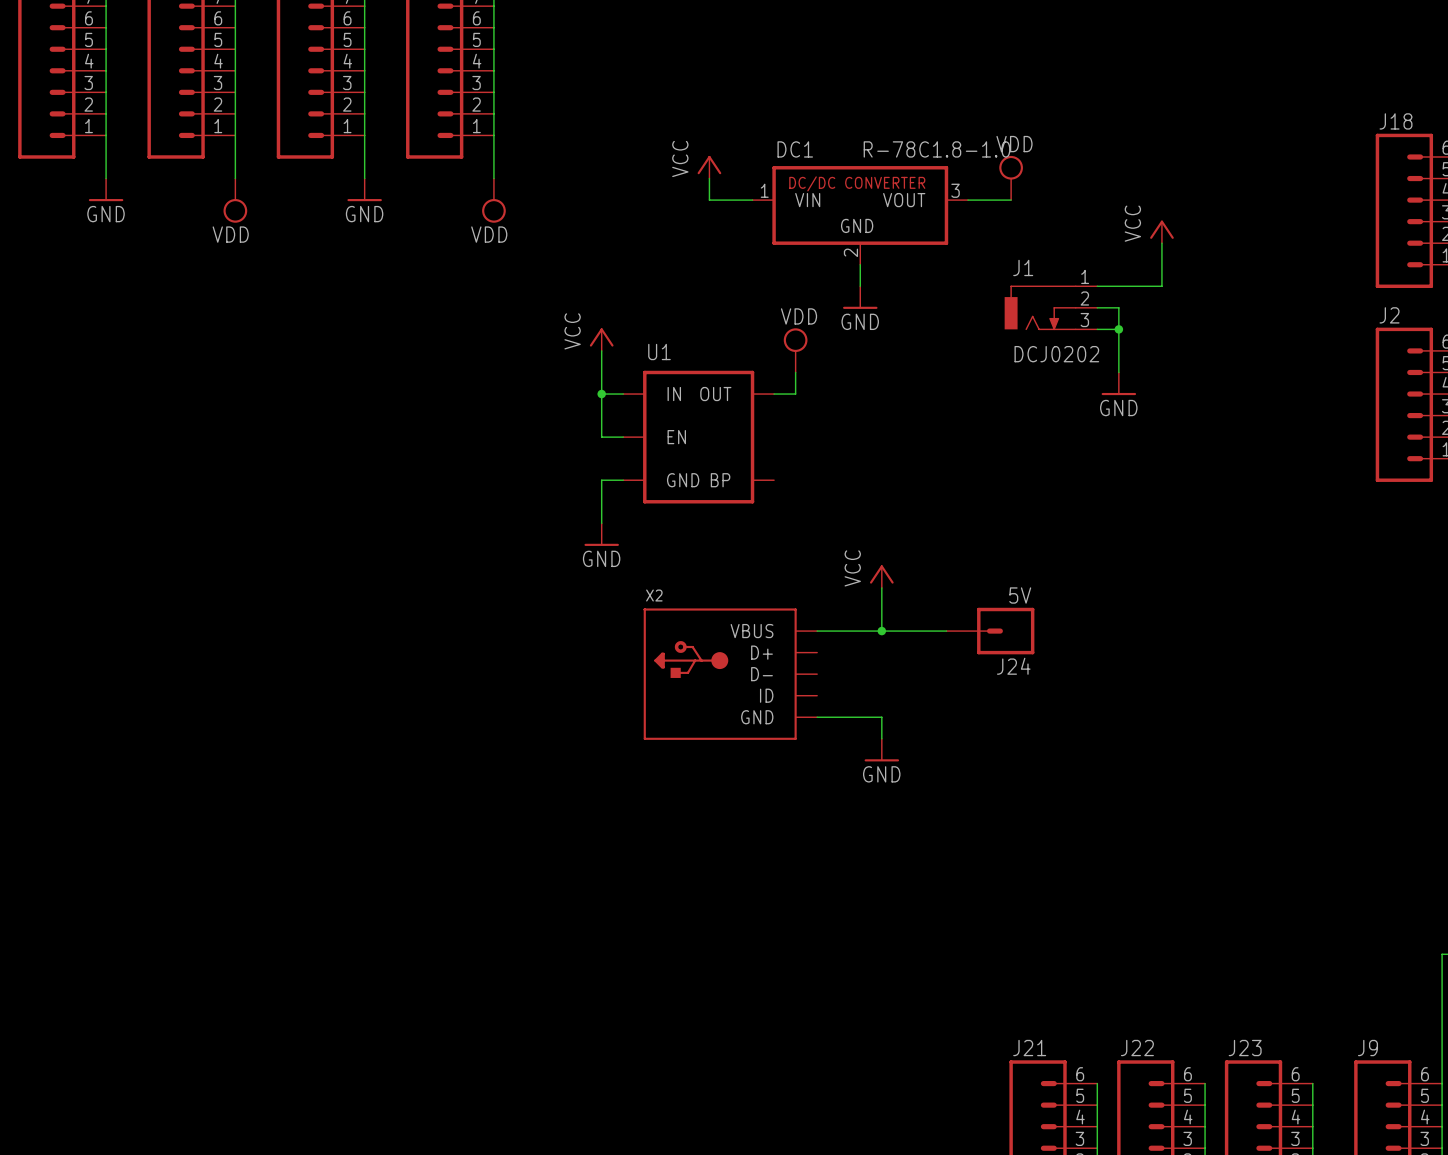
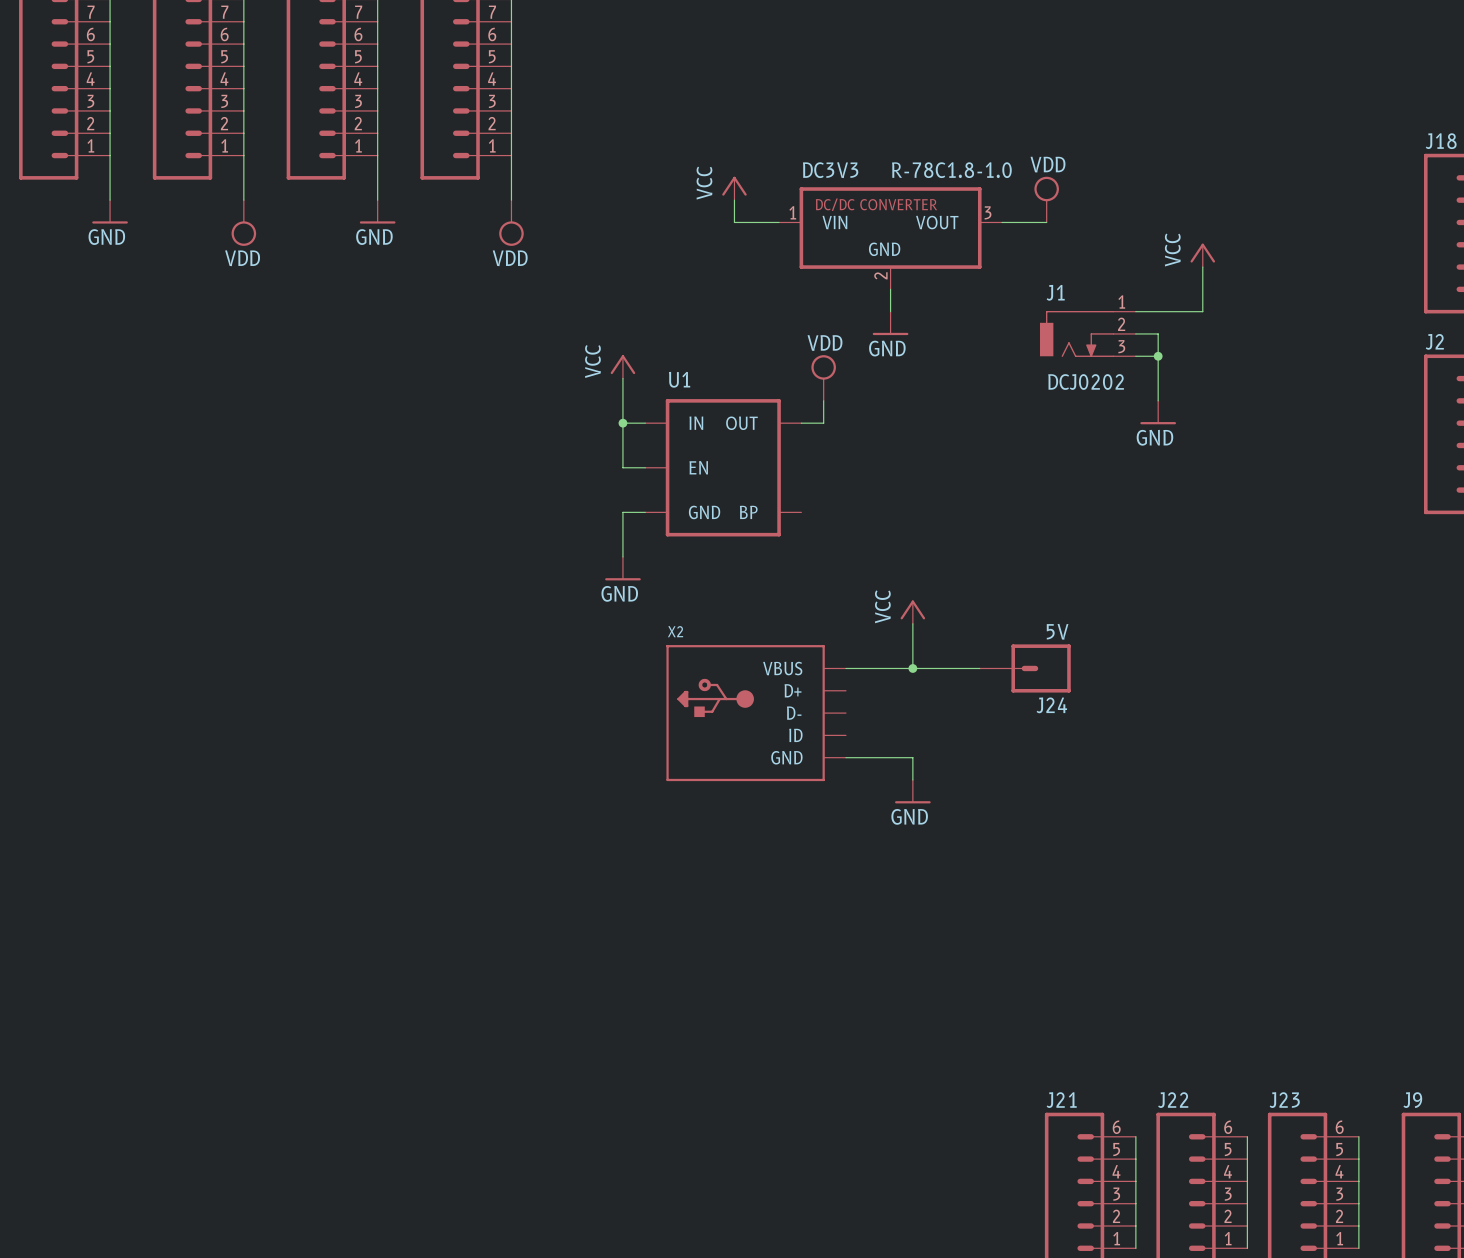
DC1 name: DC1 (795, 149) -> DC3V3 (830, 170)

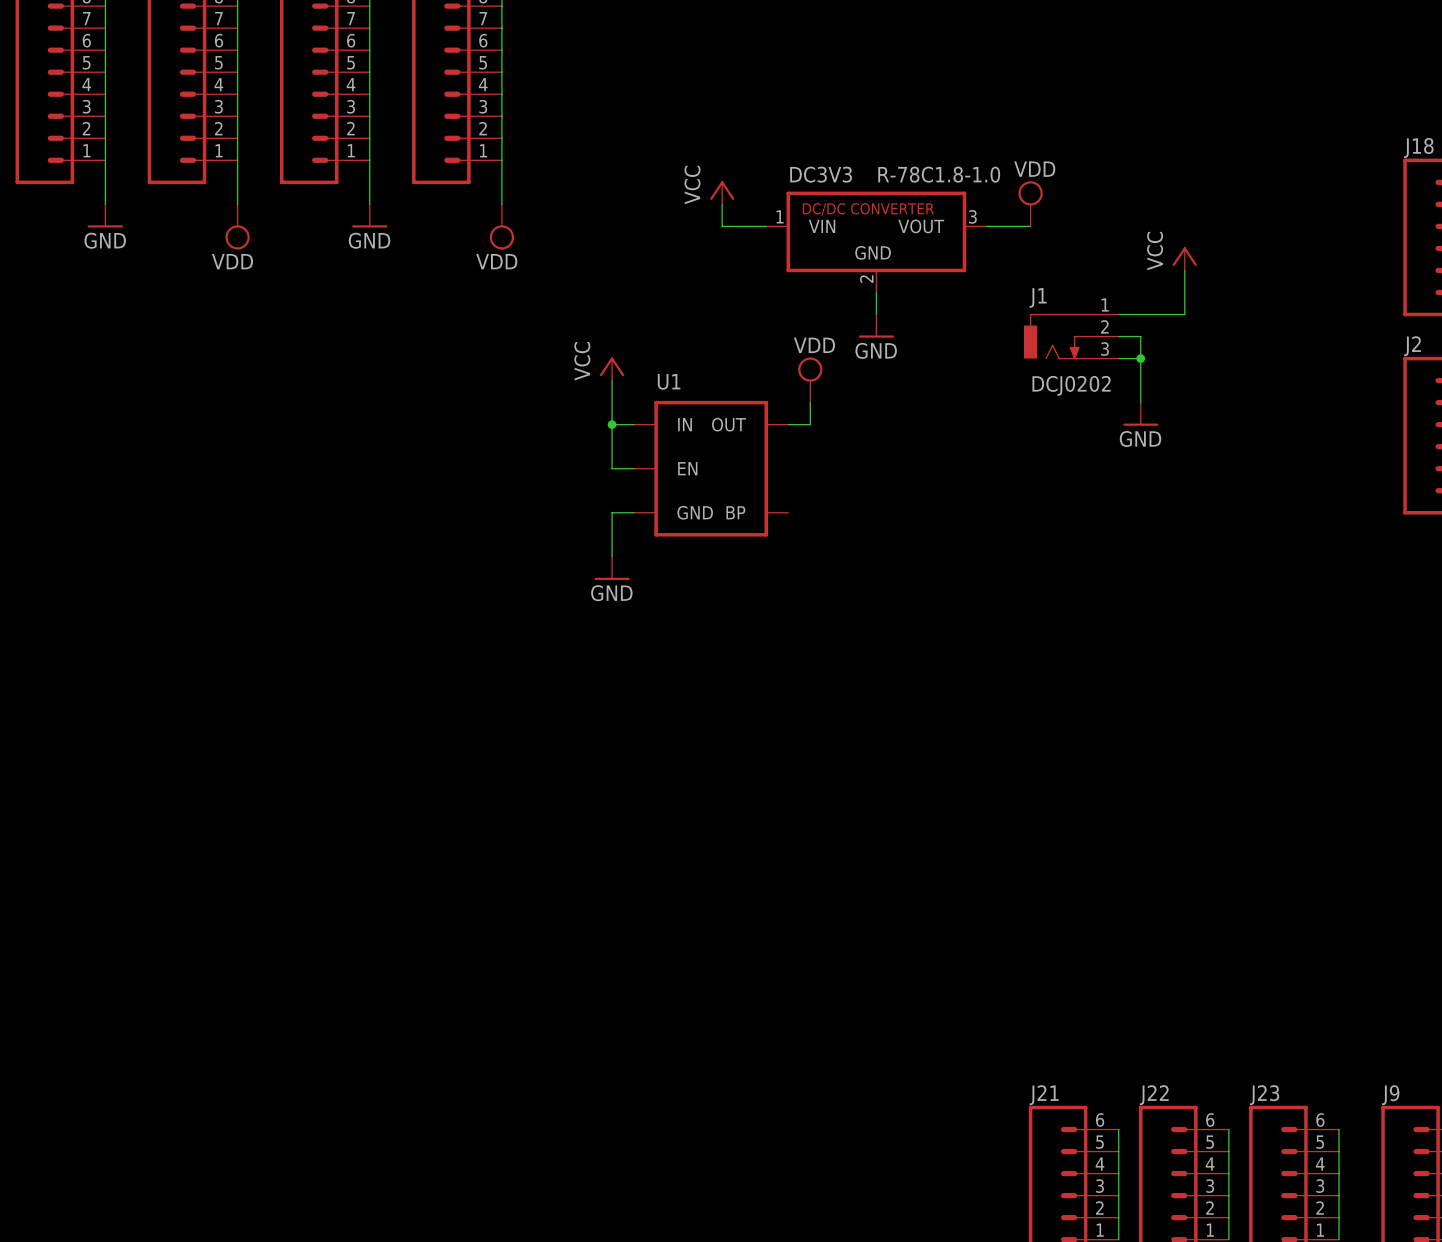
power symbol: VCC (912, 612) -> none
wire: (912, 623) (912, 668) -> none
wire: (845, 668) (979, 668) -> none
junction: (912, 668) -> none
J24: 5V (1025, 668) -> none
X2: (756, 713) -> none
wire: (845, 757) (912, 757) (912, 779) -> none
power symbol: GND (912, 791) -> none

